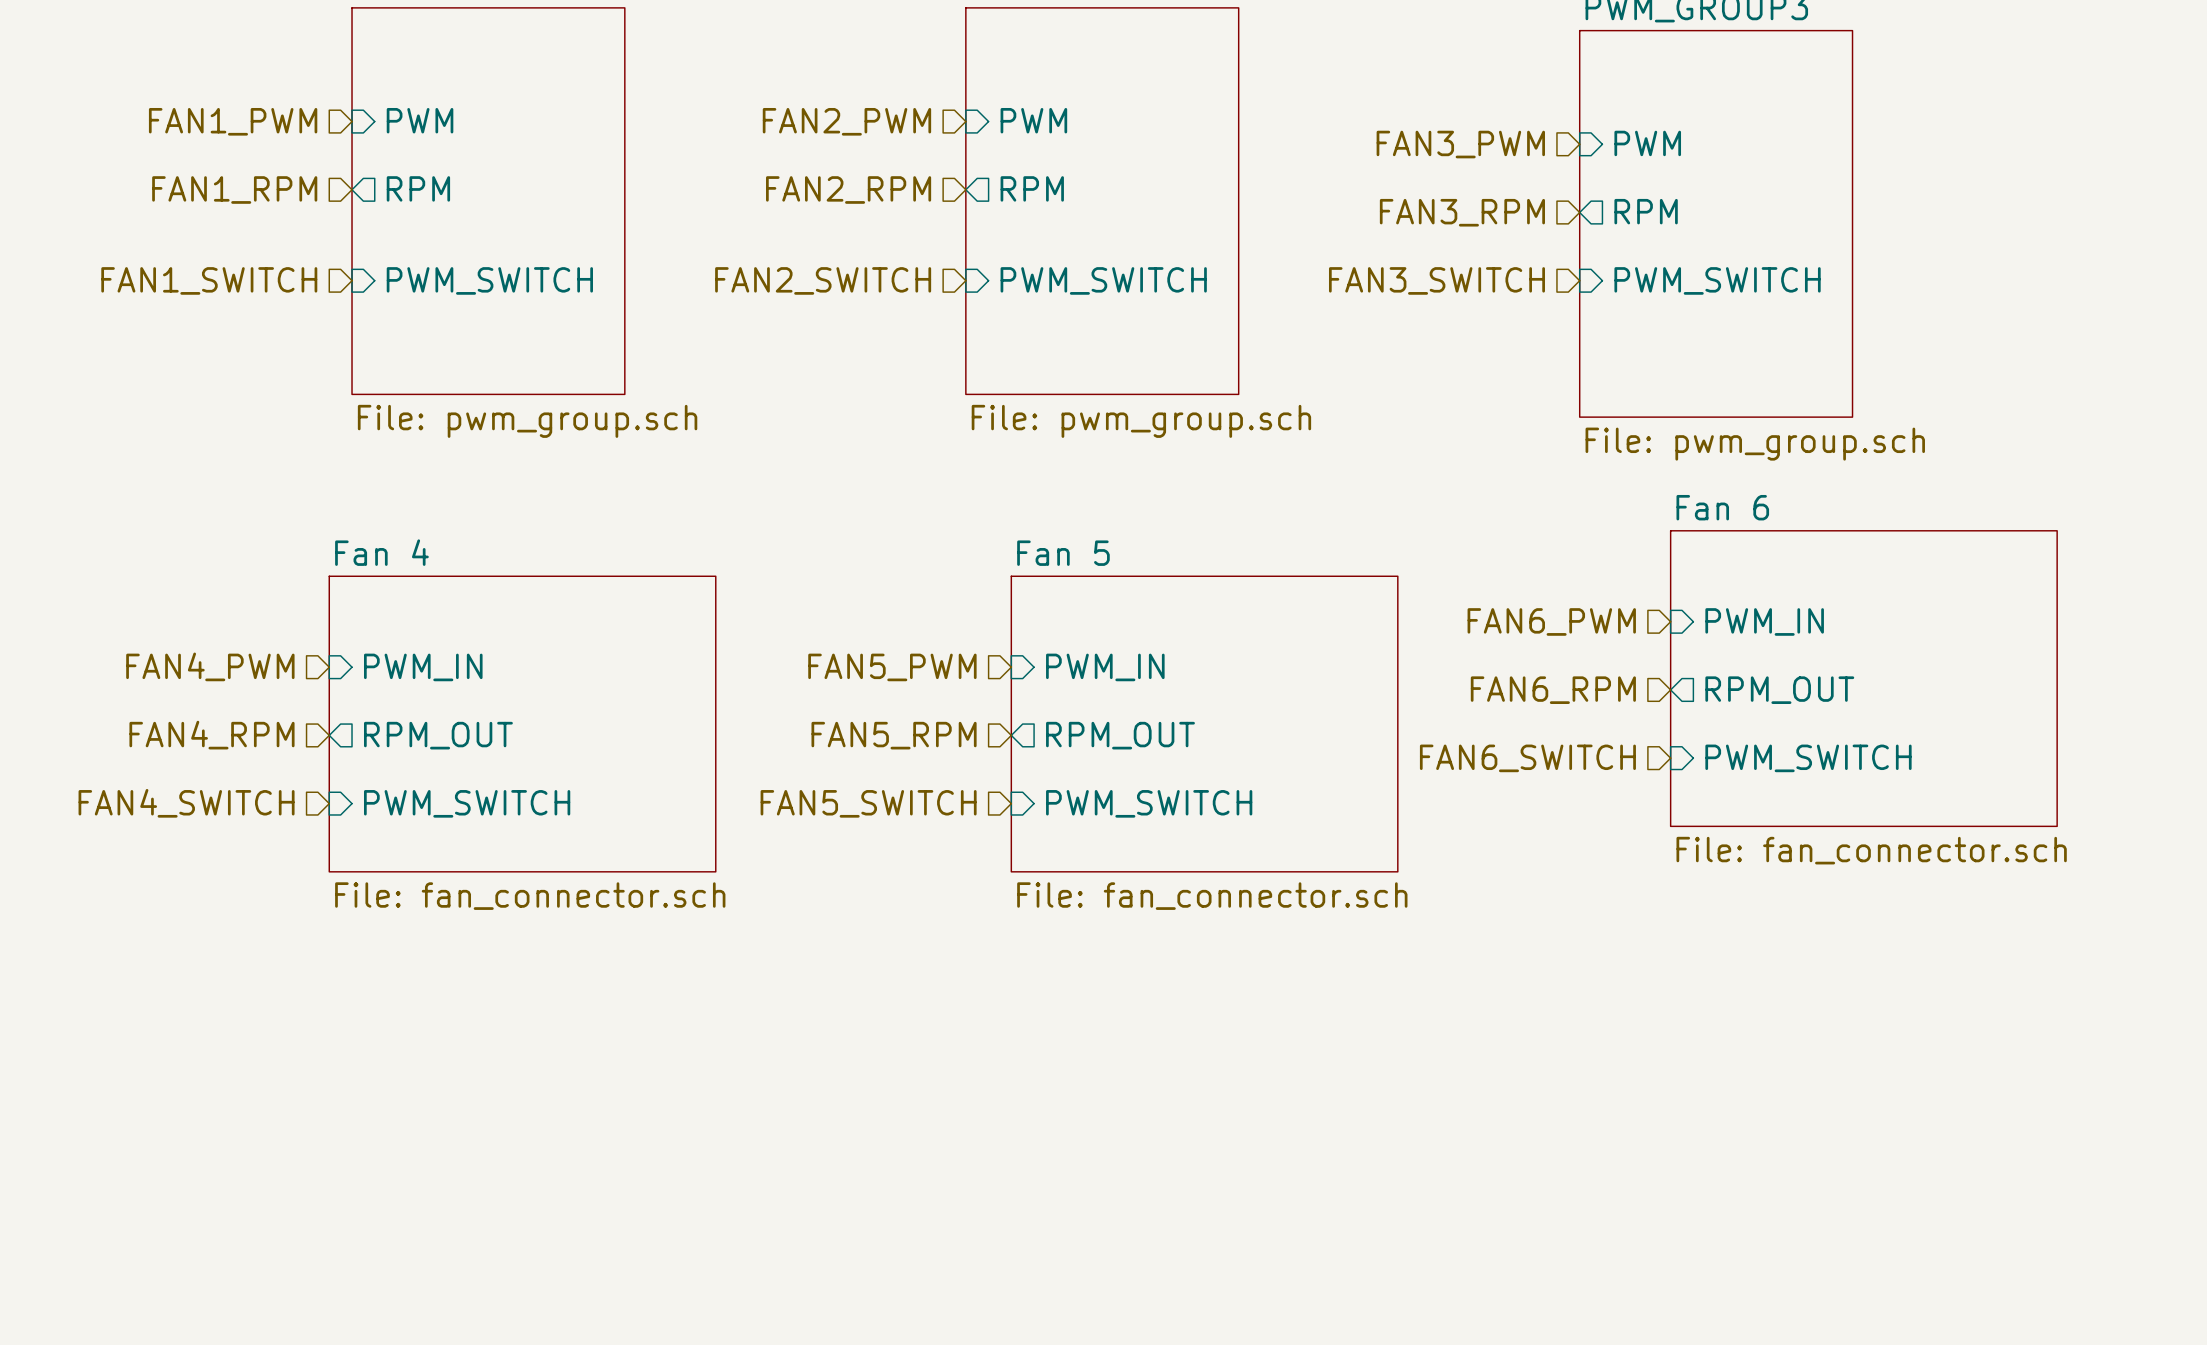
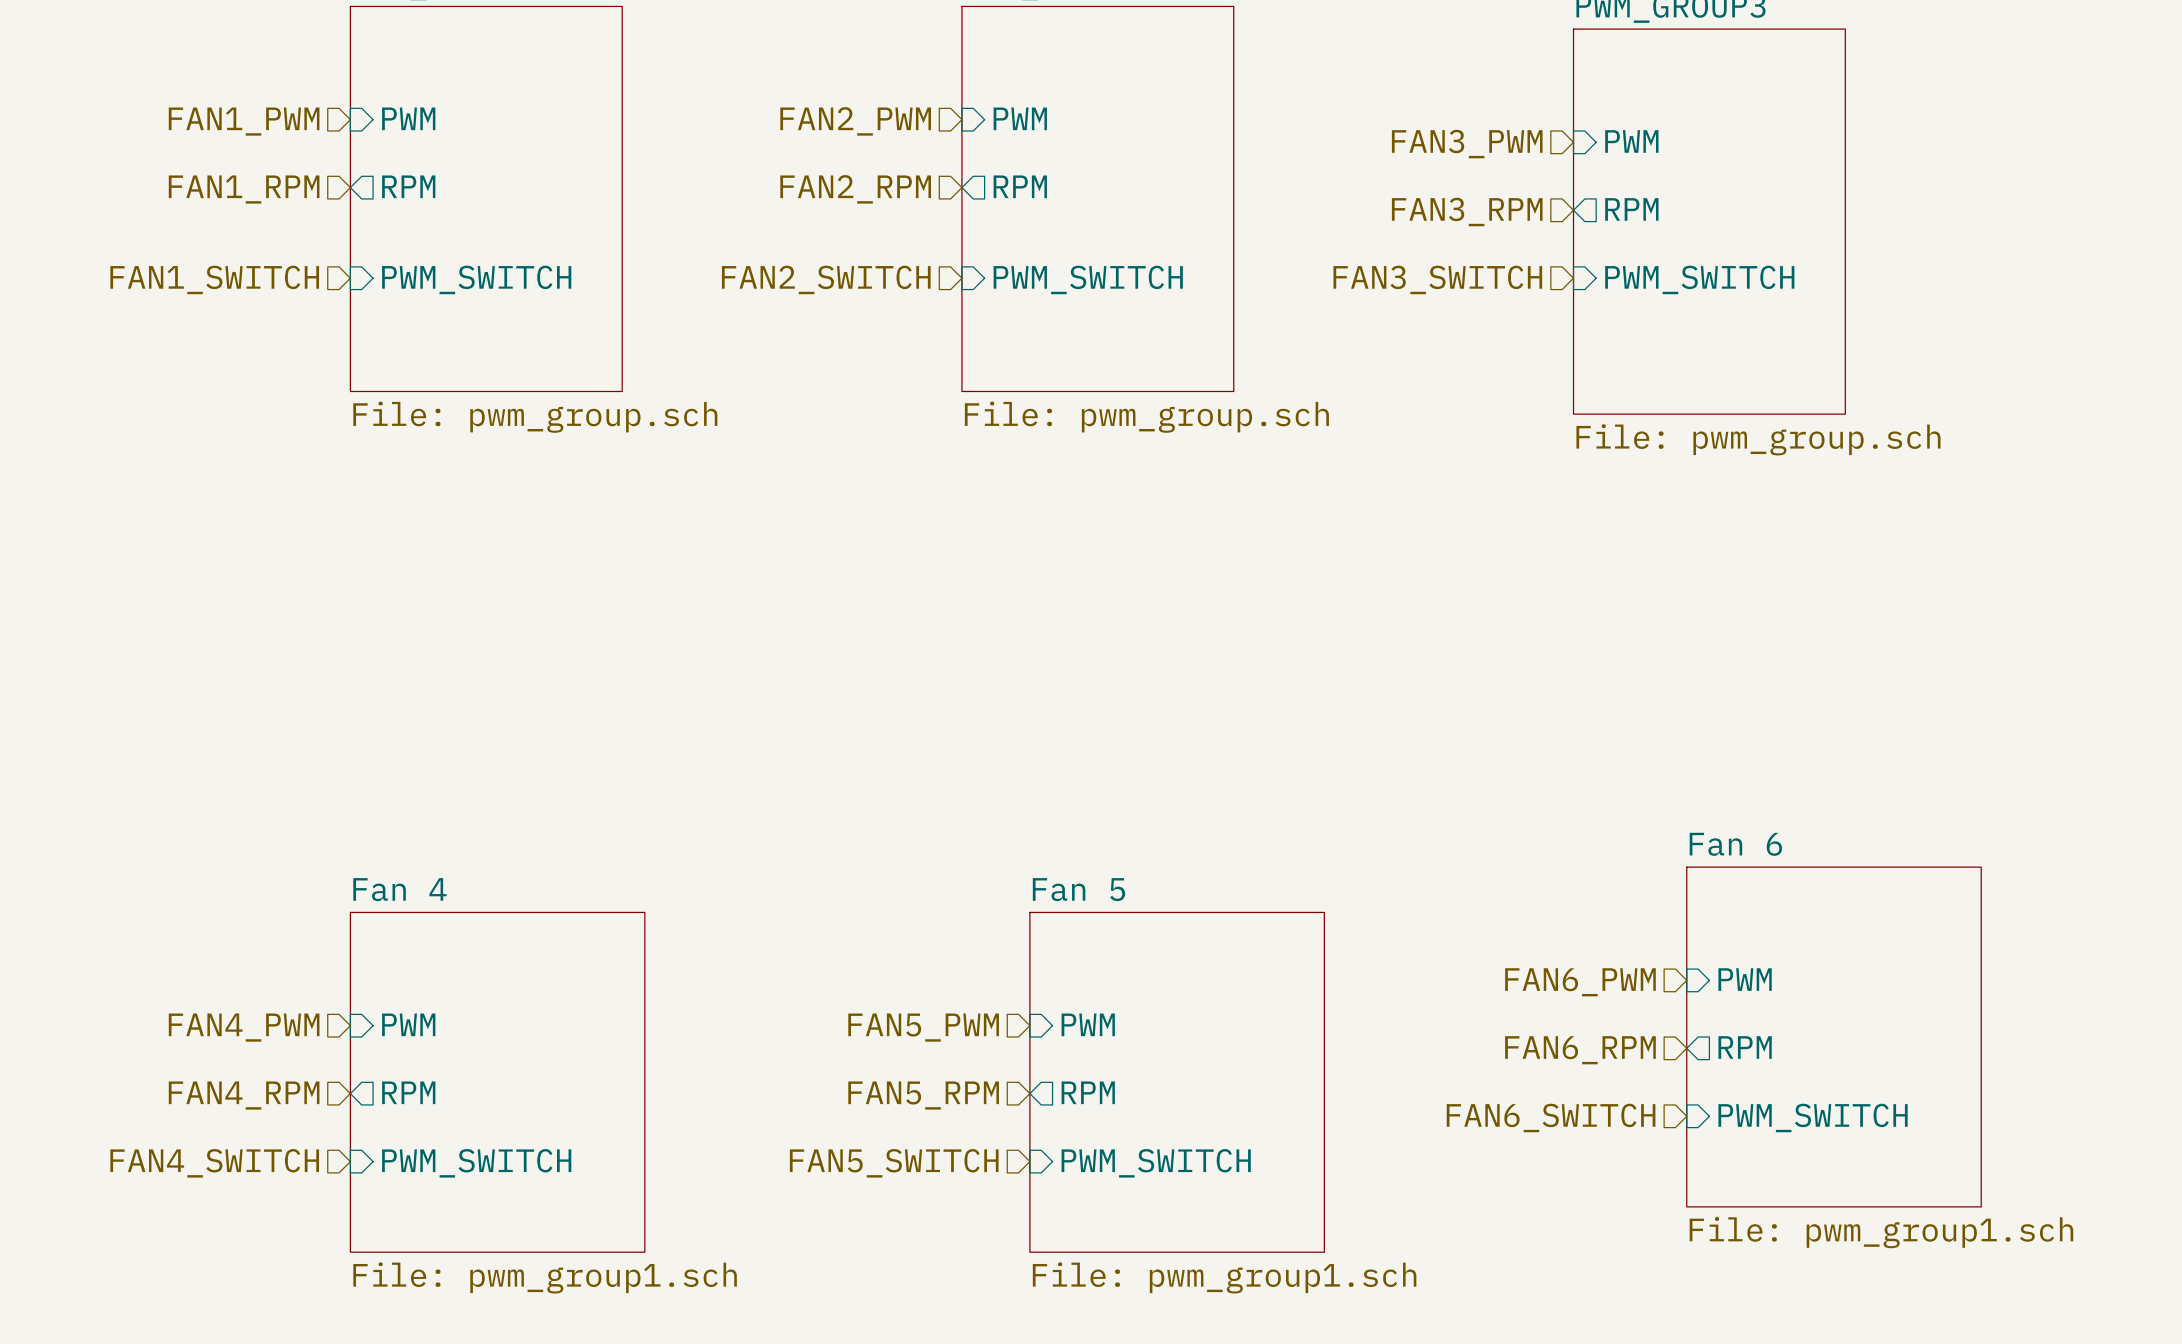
sheet Fan 6 name position: Fan 6 (1722, 507) -> Fan 6 (1735, 844)
sheet Fan 6 shape: [1670, 530, 2058, 827] -> [1686, 867, 1982, 1207]
sheet Fan 4 name position: Fan 4 (381, 552) -> Fan 4 (399, 889)
sheet Fan 5 name position: Fan 5 (1063, 553) -> Fan 5 (1078, 889)
sheet Fan 4 shape: [329, 576, 716, 872] -> [350, 912, 645, 1253]
sheet Fan 5 shape: [1011, 576, 1398, 872] -> [1029, 912, 1325, 1253]
hierarchical label position: FAN6_PWM (1551, 621) -> FAN6_PWM (1580, 982)
sheet pin: PWM_IN (1764, 621) -> none
hierarchical label position: FAN4_PWM (210, 666) -> FAN4_PWM (244, 1027)
sheet pin: PWM_IN (423, 667) -> none
hierarchical label position: FAN5_PWM (892, 667) -> FAN5_PWM (923, 1027)
sheet pin: PWM_IN (1105, 667) -> none
hierarchical label position: FAN6_RPM (1553, 690) -> FAN6_RPM (1580, 1050)
sheet pin: RPM_OUT (1779, 690) -> none
hierarchical label position: FAN4_RPM (211, 735) -> FAN4_RPM (244, 1095)
sheet pin: RPM_OUT (438, 735) -> none
hierarchical label position: FAN5_RPM (894, 735) -> FAN5_RPM (923, 1095)
sheet pin: RPM_OUT (1120, 735) -> none
hierarchical label position: FAN6_SWITCH (1527, 758) -> FAN6_SWITCH (1551, 1117)
sheet pin position: PWM_SWITCH (1808, 758) -> PWM_SWITCH (1813, 1117)
hierarchical label position: FAN4_SWITCH (186, 803) -> FAN4_SWITCH (214, 1163)
sheet pin position: PWM_SWITCH (467, 803) -> PWM_SWITCH (476, 1163)
hierarchical label position: FAN5_SWITCH (868, 803) -> FAN5_SWITCH (894, 1163)
sheet pin position: PWM_SWITCH (1149, 803) -> PWM_SWITCH (1156, 1163)
sheet Fan 6 value: File: fan_connector.sch (1871, 850) -> File: pwm_group1.sch (1881, 1232)
sheet Fan 4 value: File: fan_connector.sch (530, 896) -> File: pwm_group1.sch (545, 1277)
sheet Fan 5 value: File: fan_connector.sch (1212, 896) -> File: pwm_group1.sch (1224, 1277)
sheet pin: none -> PWM (1745, 979)
sheet pin: none -> PWM (408, 1024)
sheet pin: none -> PWM (1088, 1024)
sheet pin: none -> RPM (1745, 1047)
sheet pin: none -> RPM (408, 1092)
sheet pin: none -> RPM (1088, 1092)

